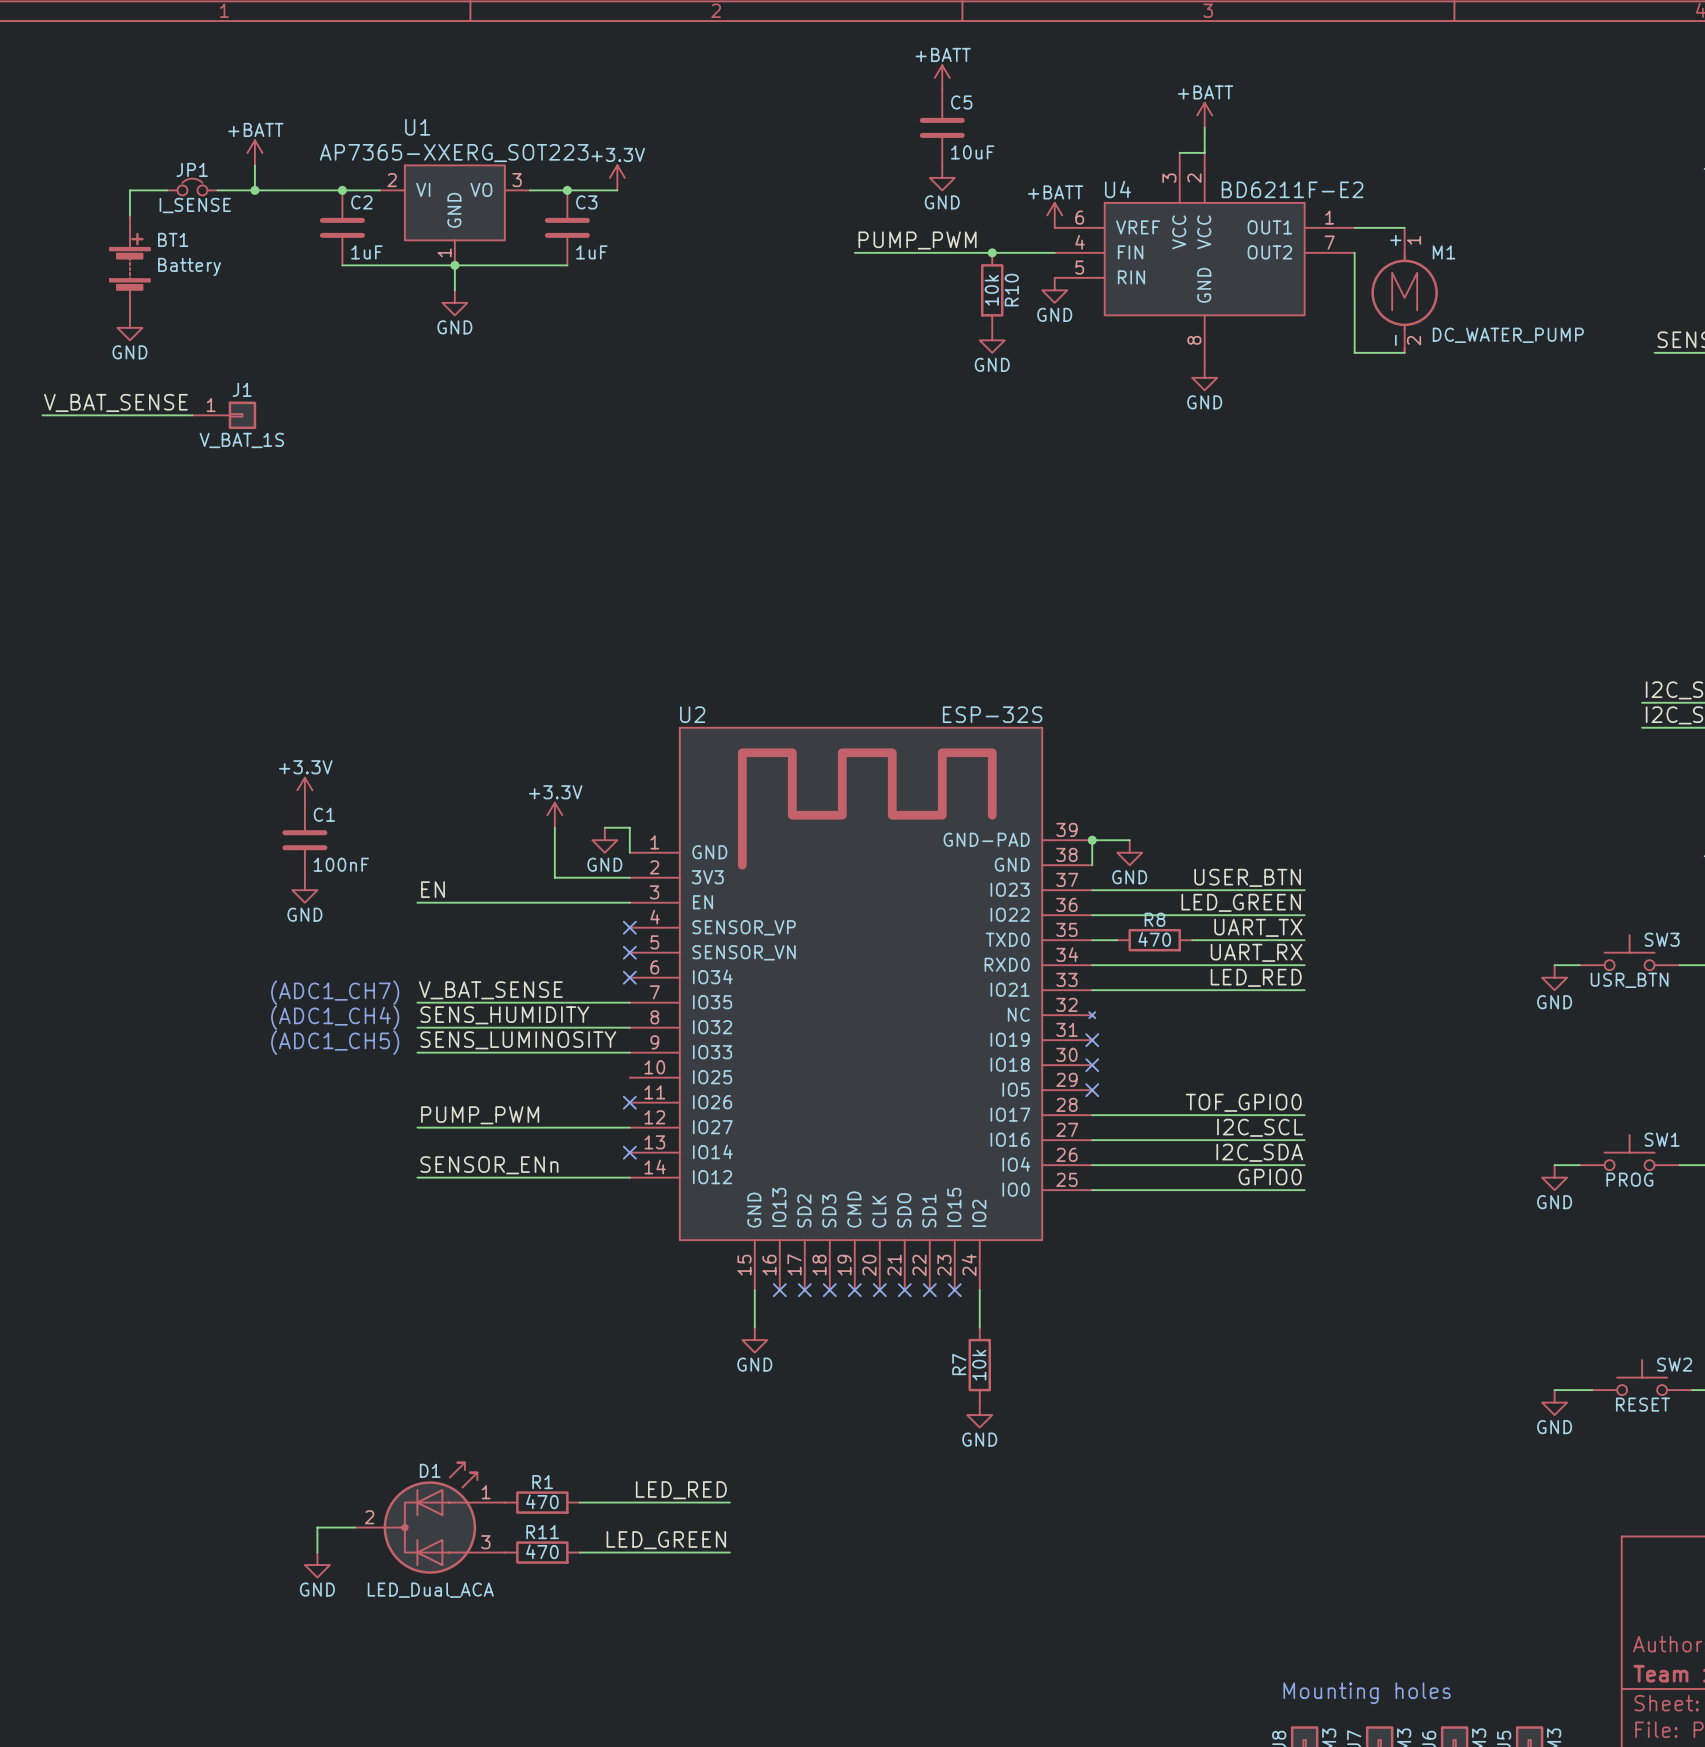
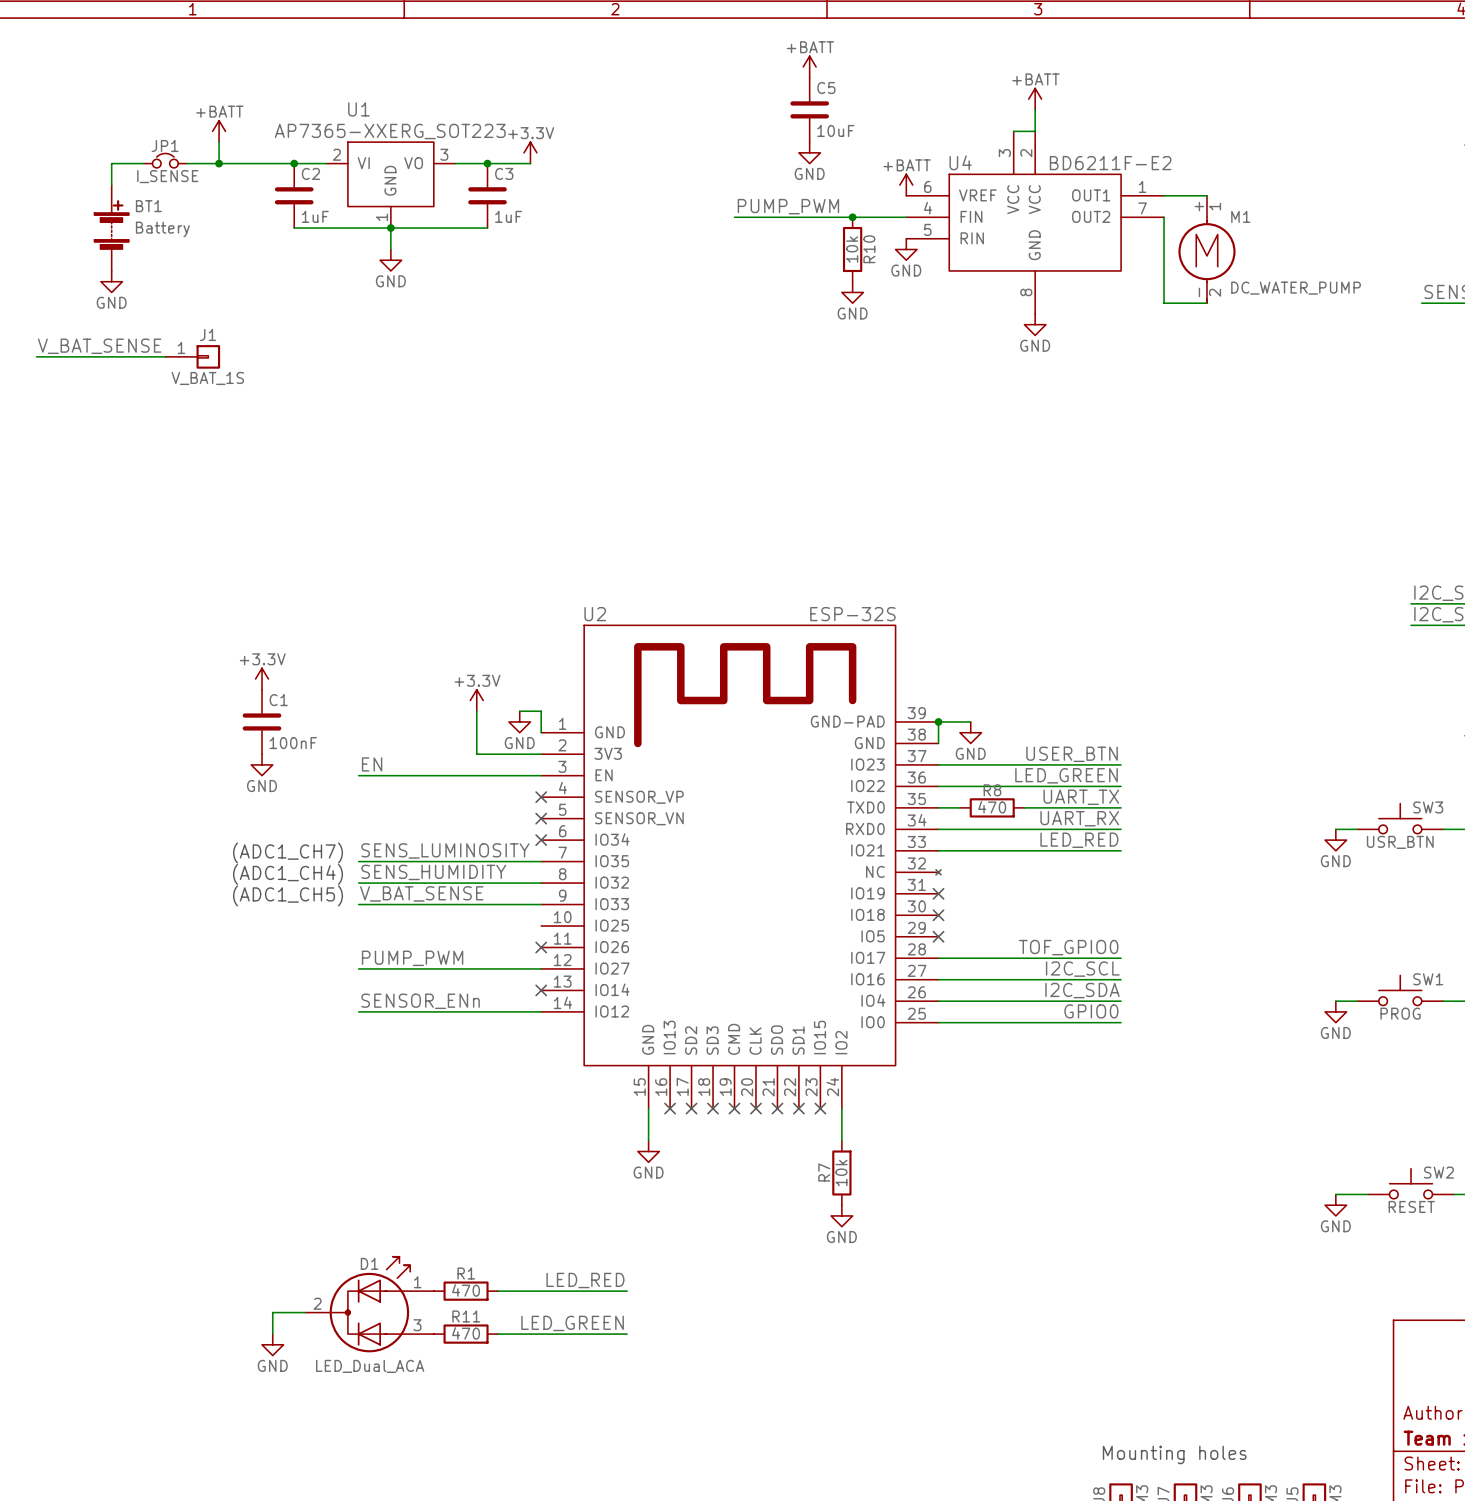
label: V_BAT_SENSE (490, 990) -> SENS_LUMINOSITY (445, 850)
label: SENS_LUMINOSITY (518, 1040) -> V_BAT_SENSE (421, 893)

